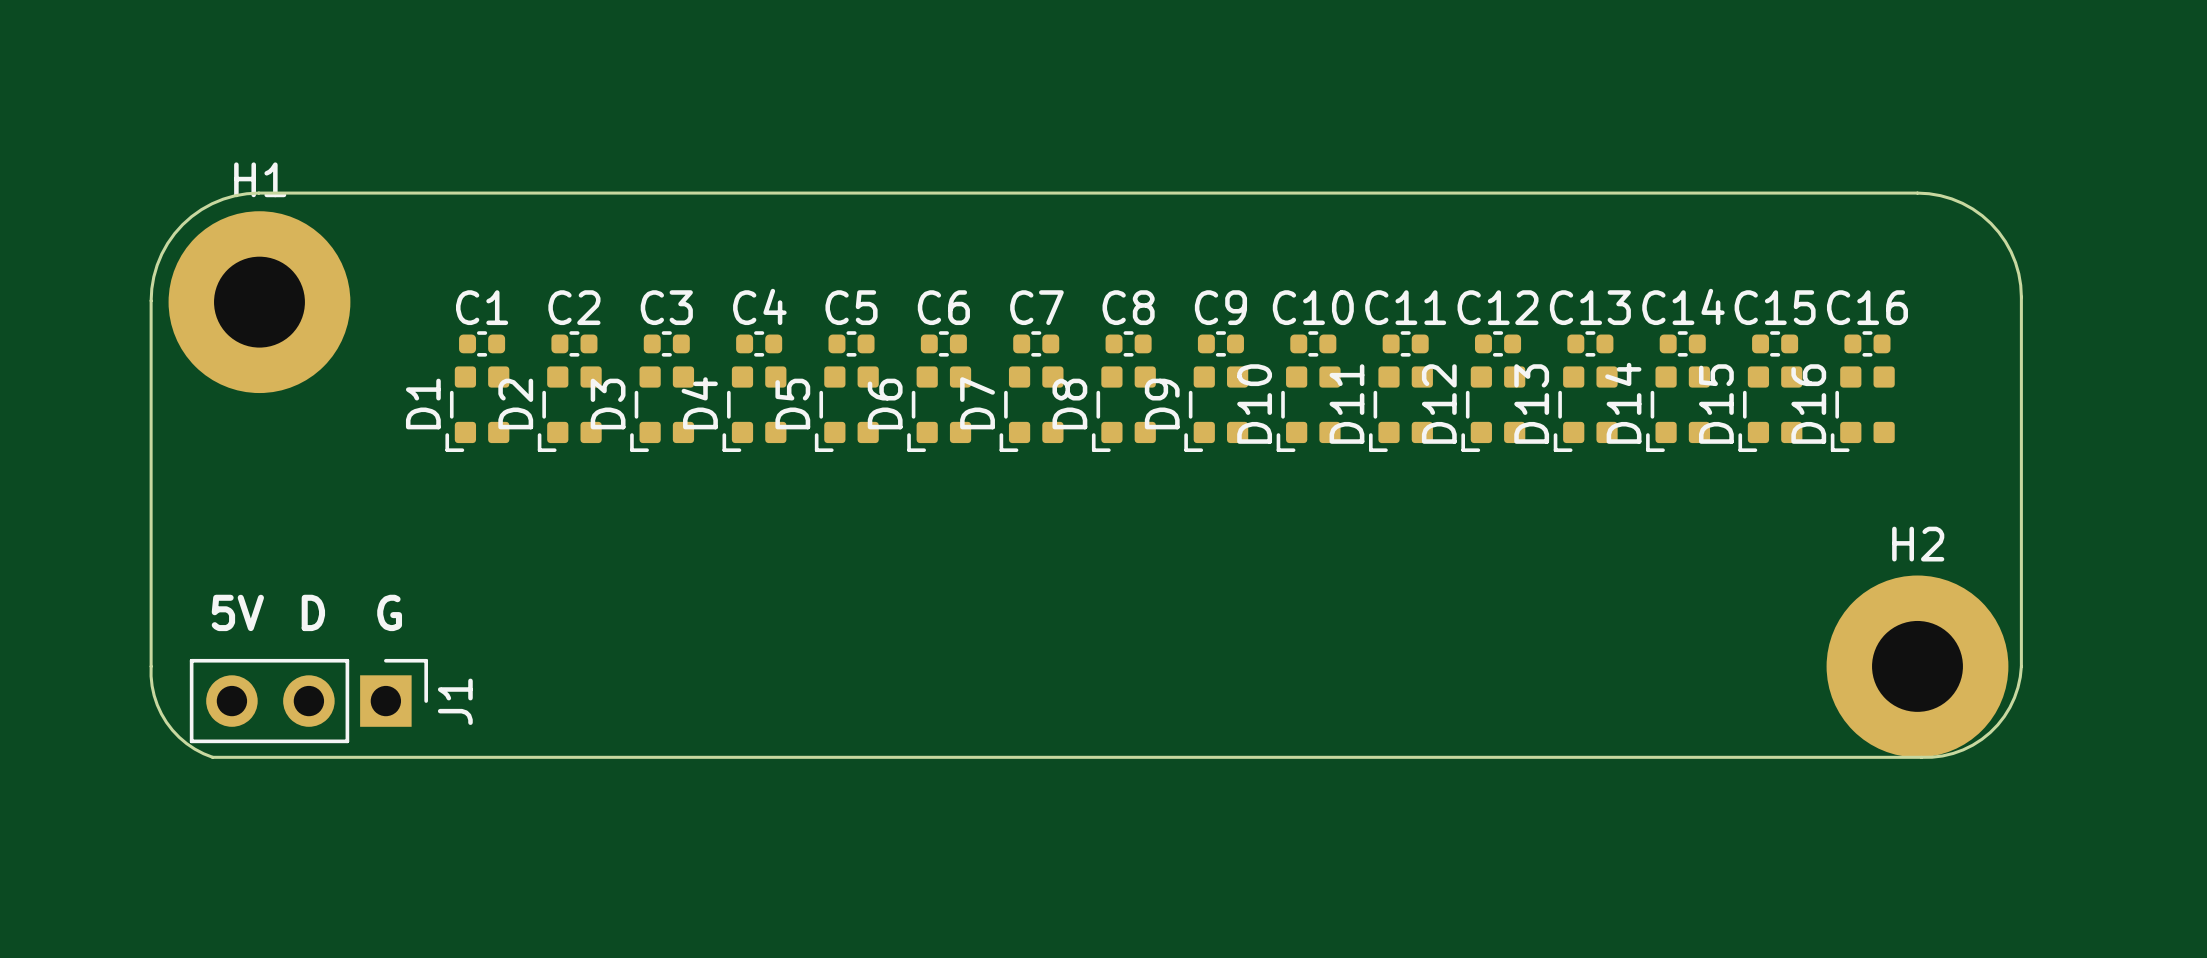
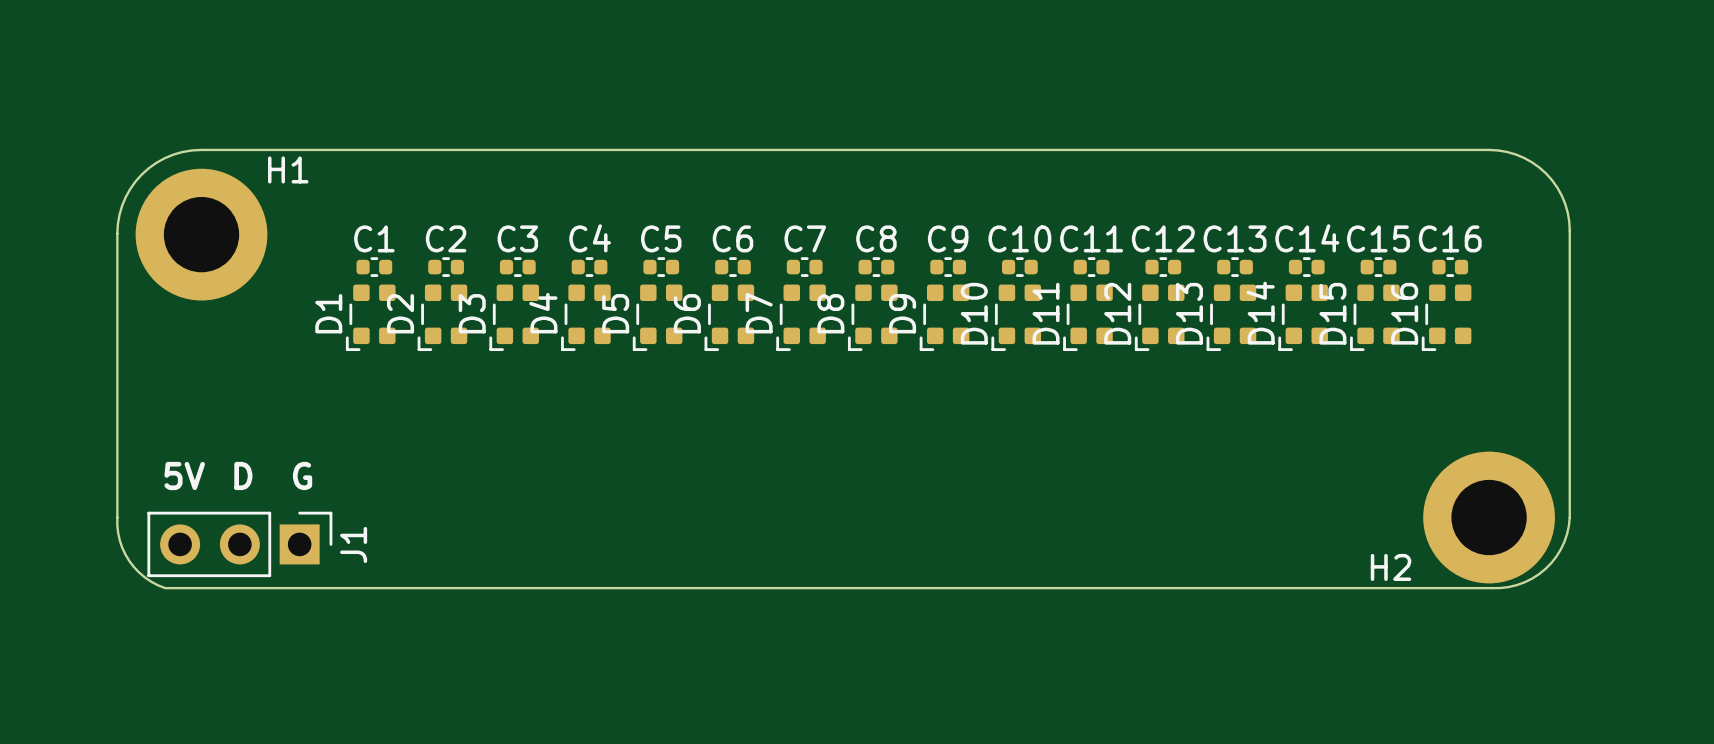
H1 name position: H1 (260, 179) -> H1 (288, 169)
H1 footprint: [168, 211, 351, 394] -> [135, 168, 268, 301]
H2 name position: H2 (1918, 544) -> H2 (1391, 567)
H2 footprint: [1826, 575, 2009, 758] -> [1423, 451, 1555, 584]

